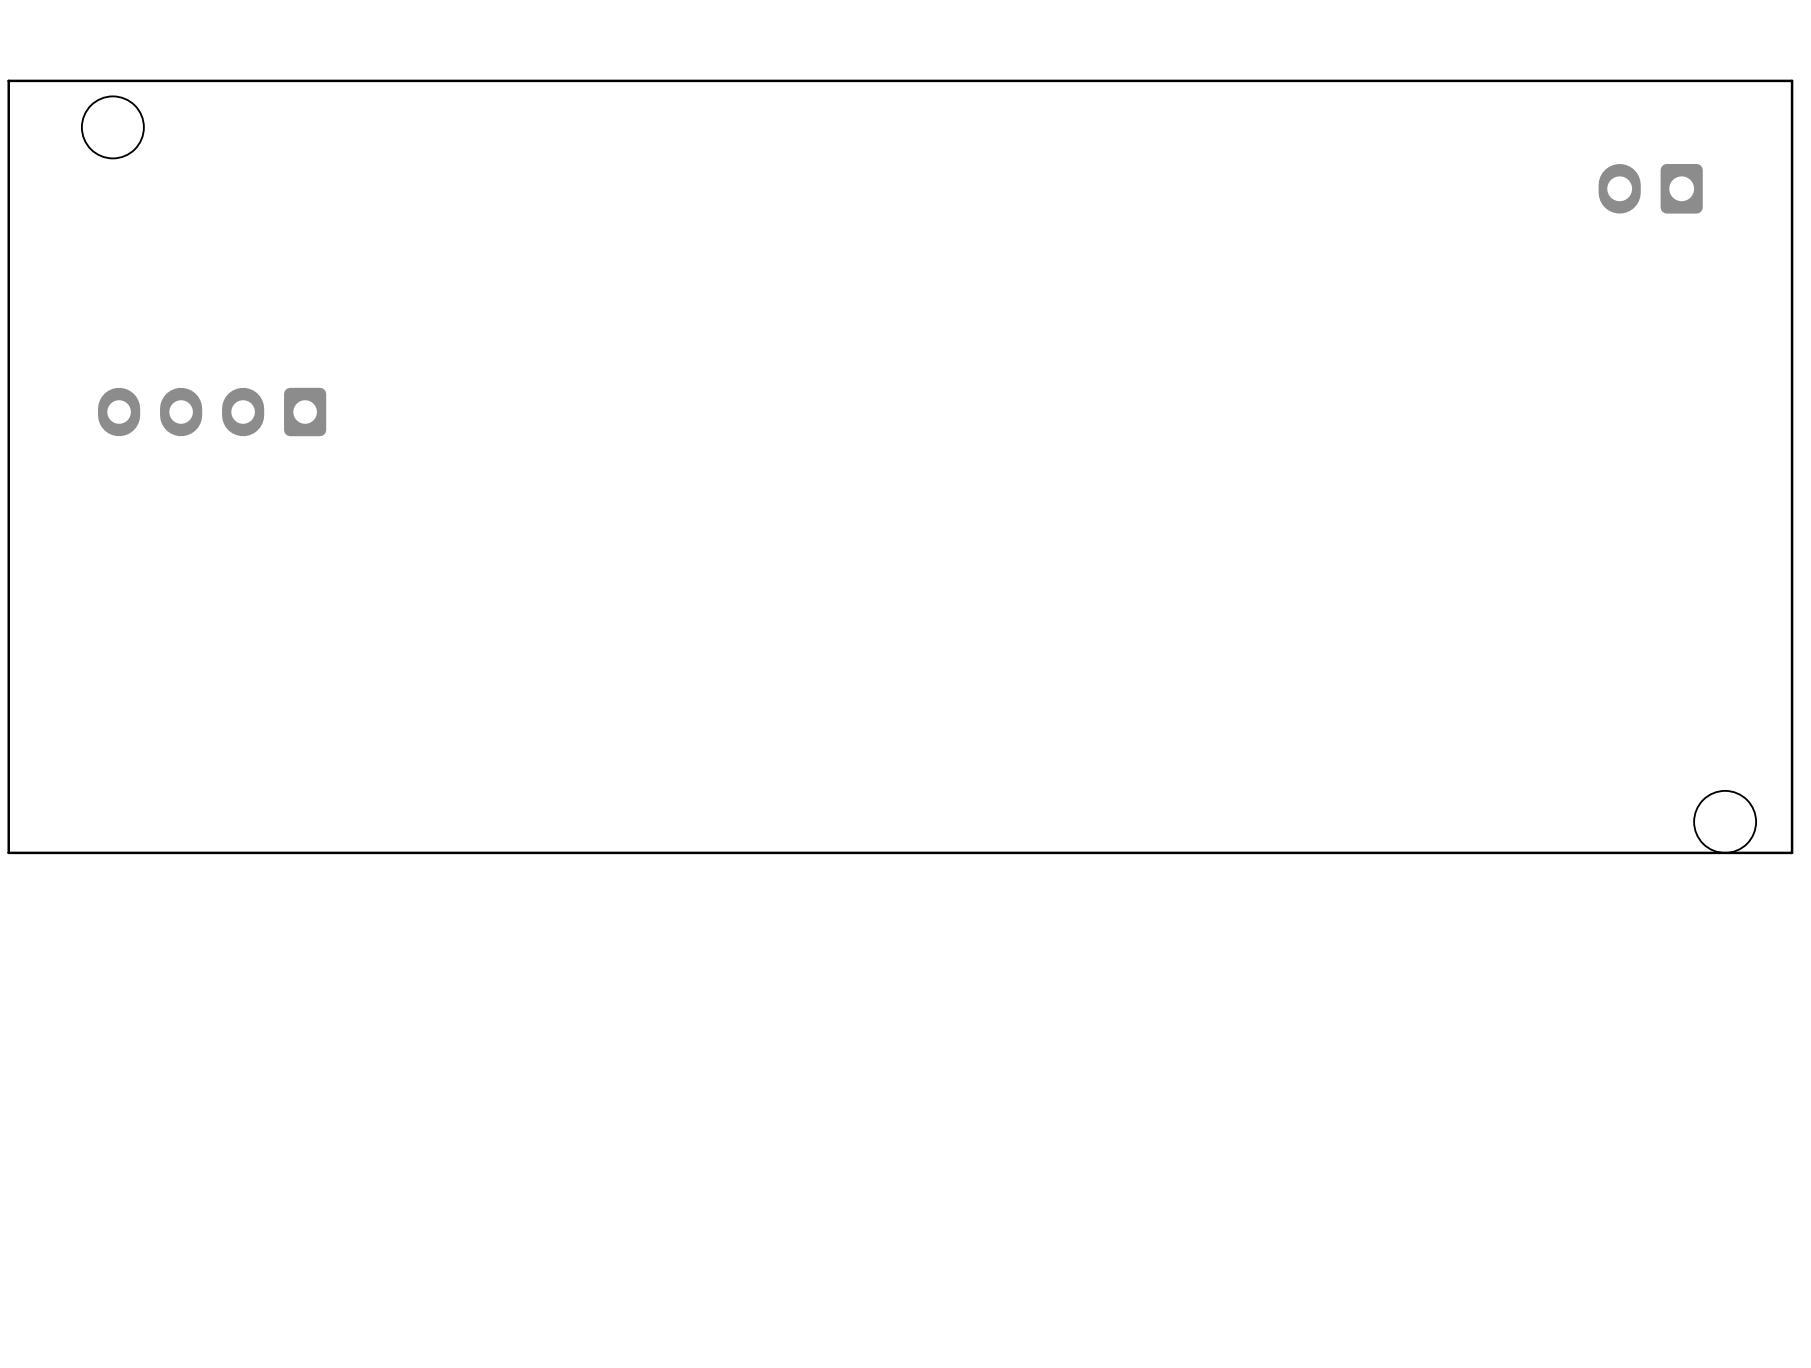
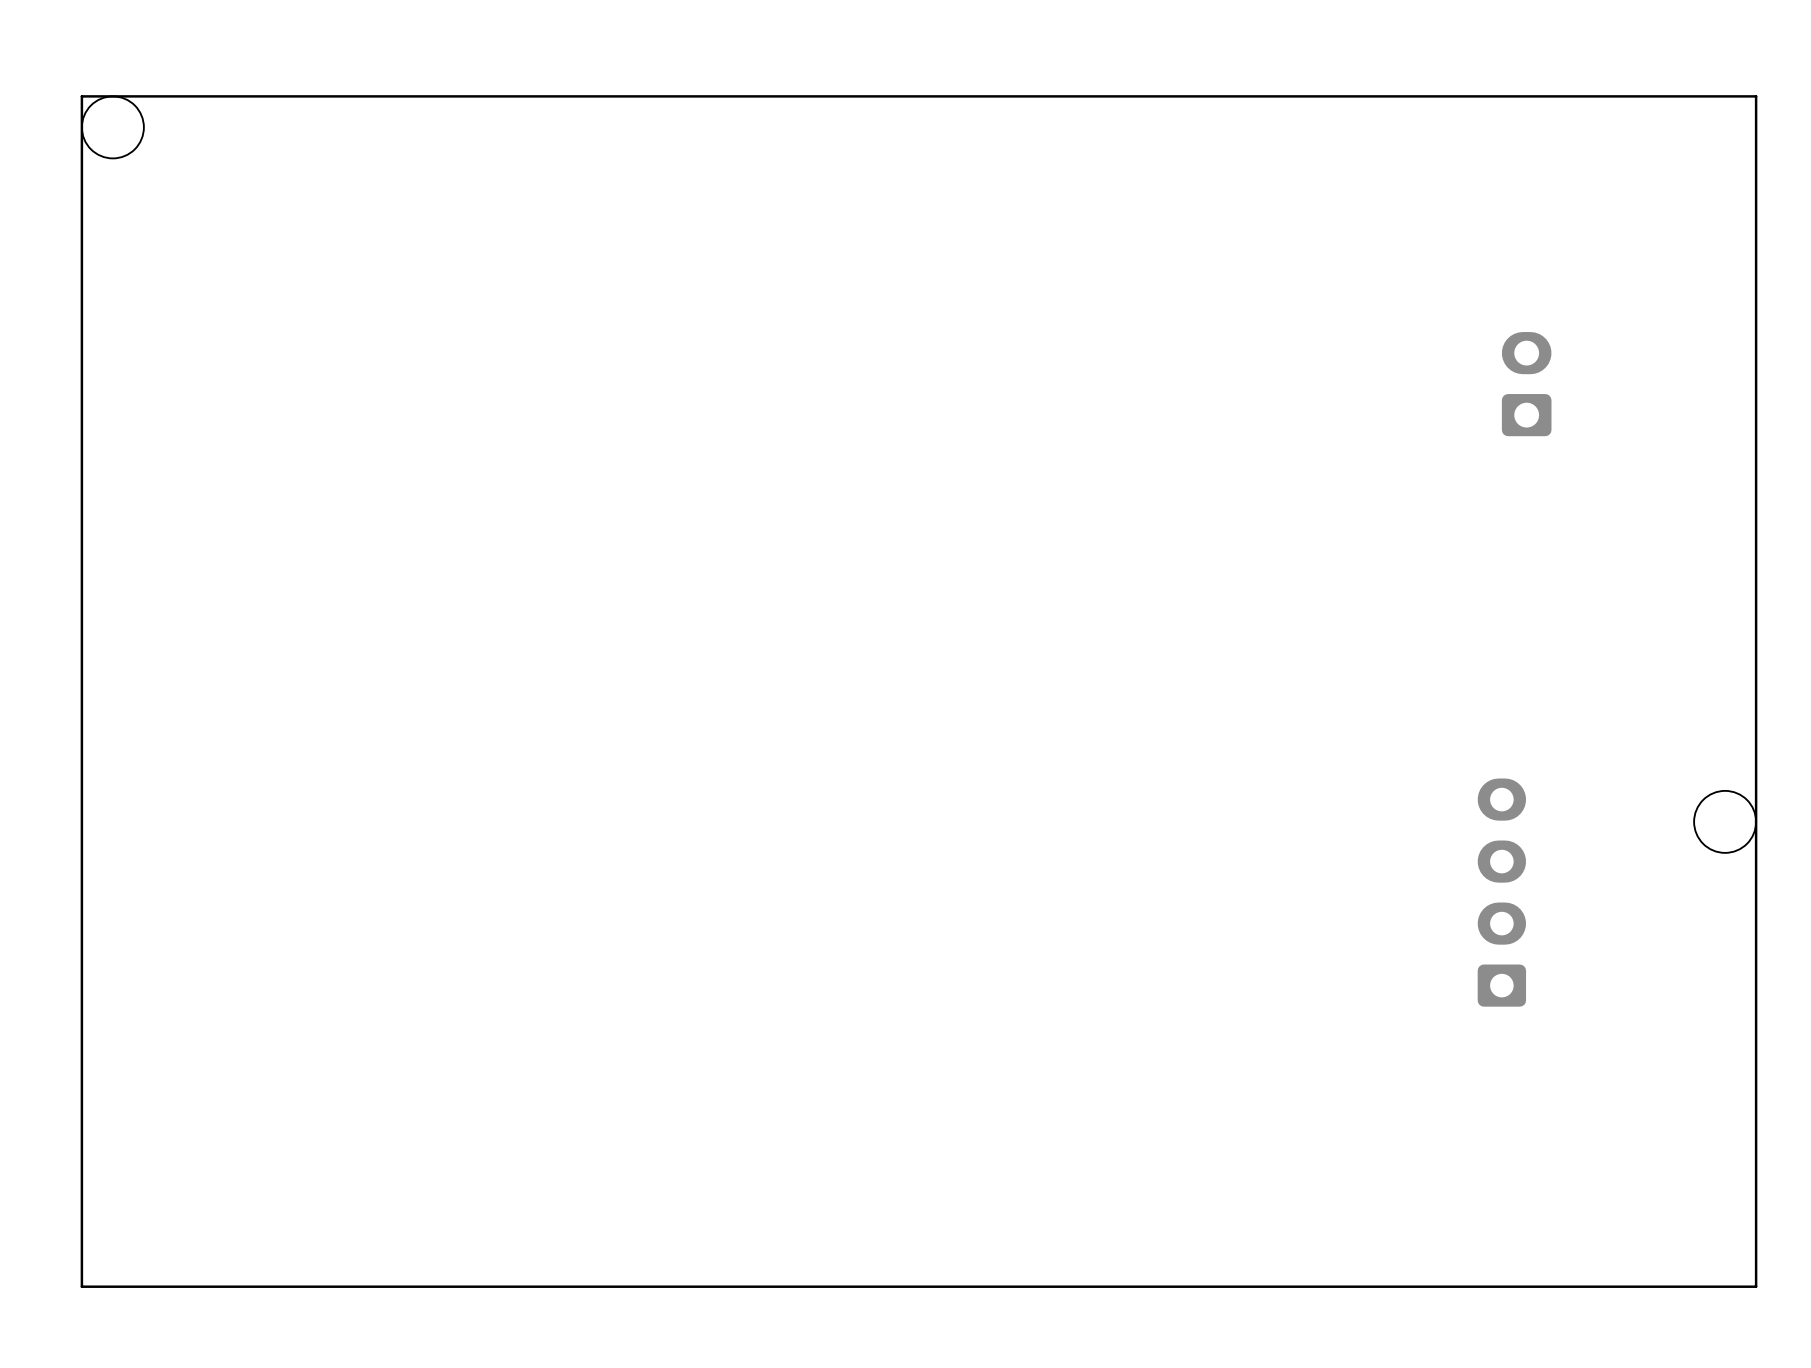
board edge: (1792, 80) (8, 80) (8, 852) (1792, 852) (1792, 80) -> (1756, 96) (1756, 1286) (81, 1286) (81, 96) (1756, 96)
part rotation: 0° (1650, 188) -> 90° clockwise (1526, 384)
part position: (1650, 188) -> (1526, 384)
part: (212, 412) -> none
part: none -> (1501, 892)

